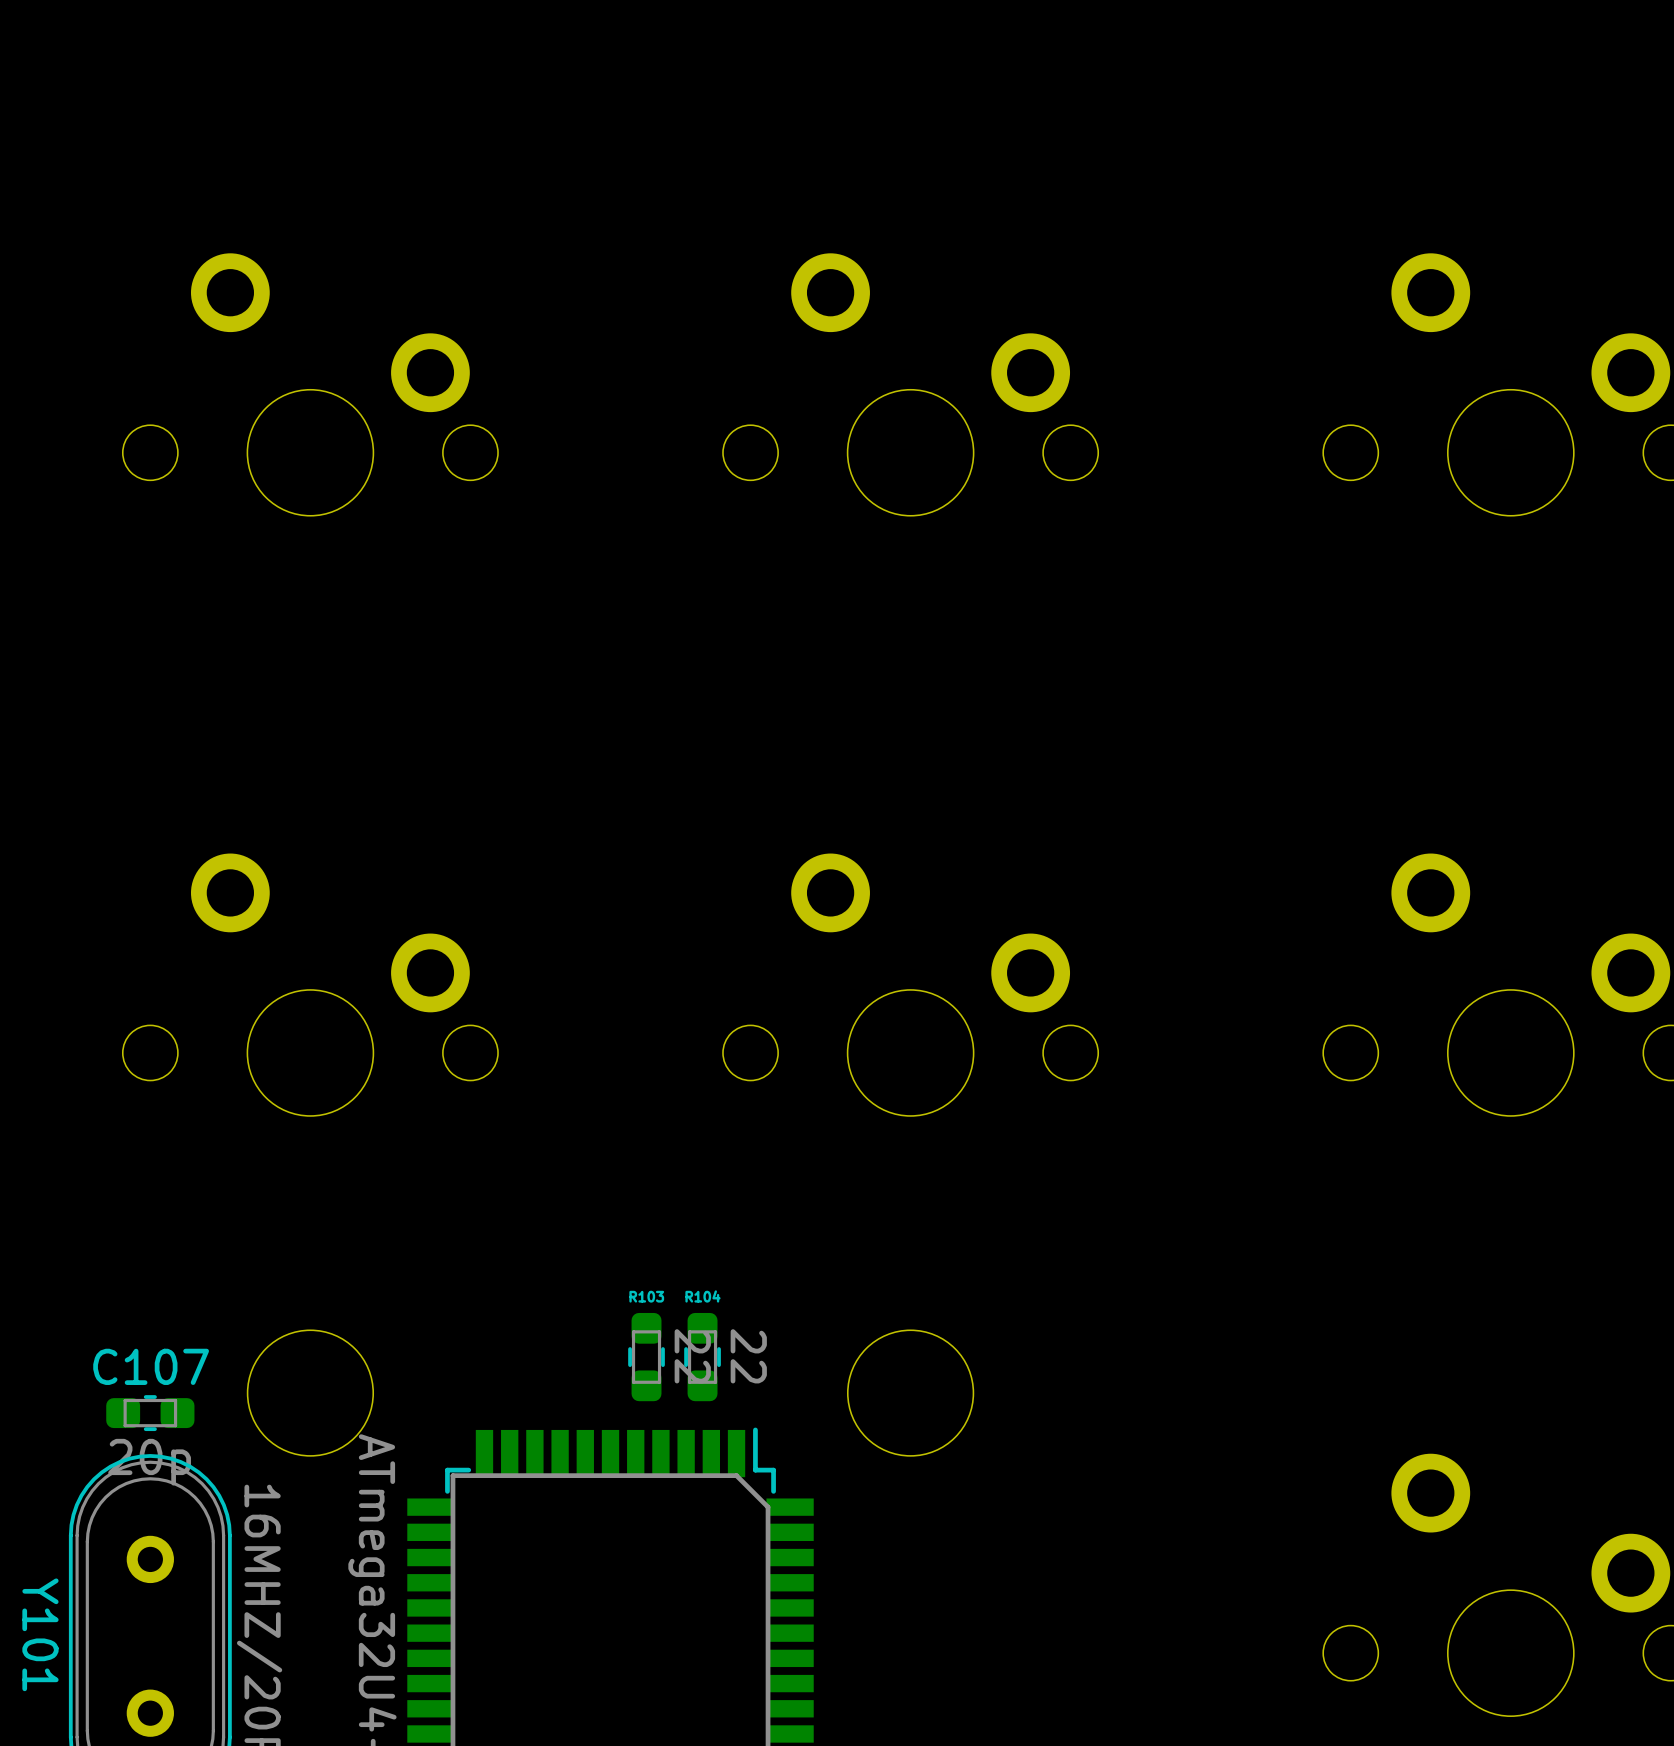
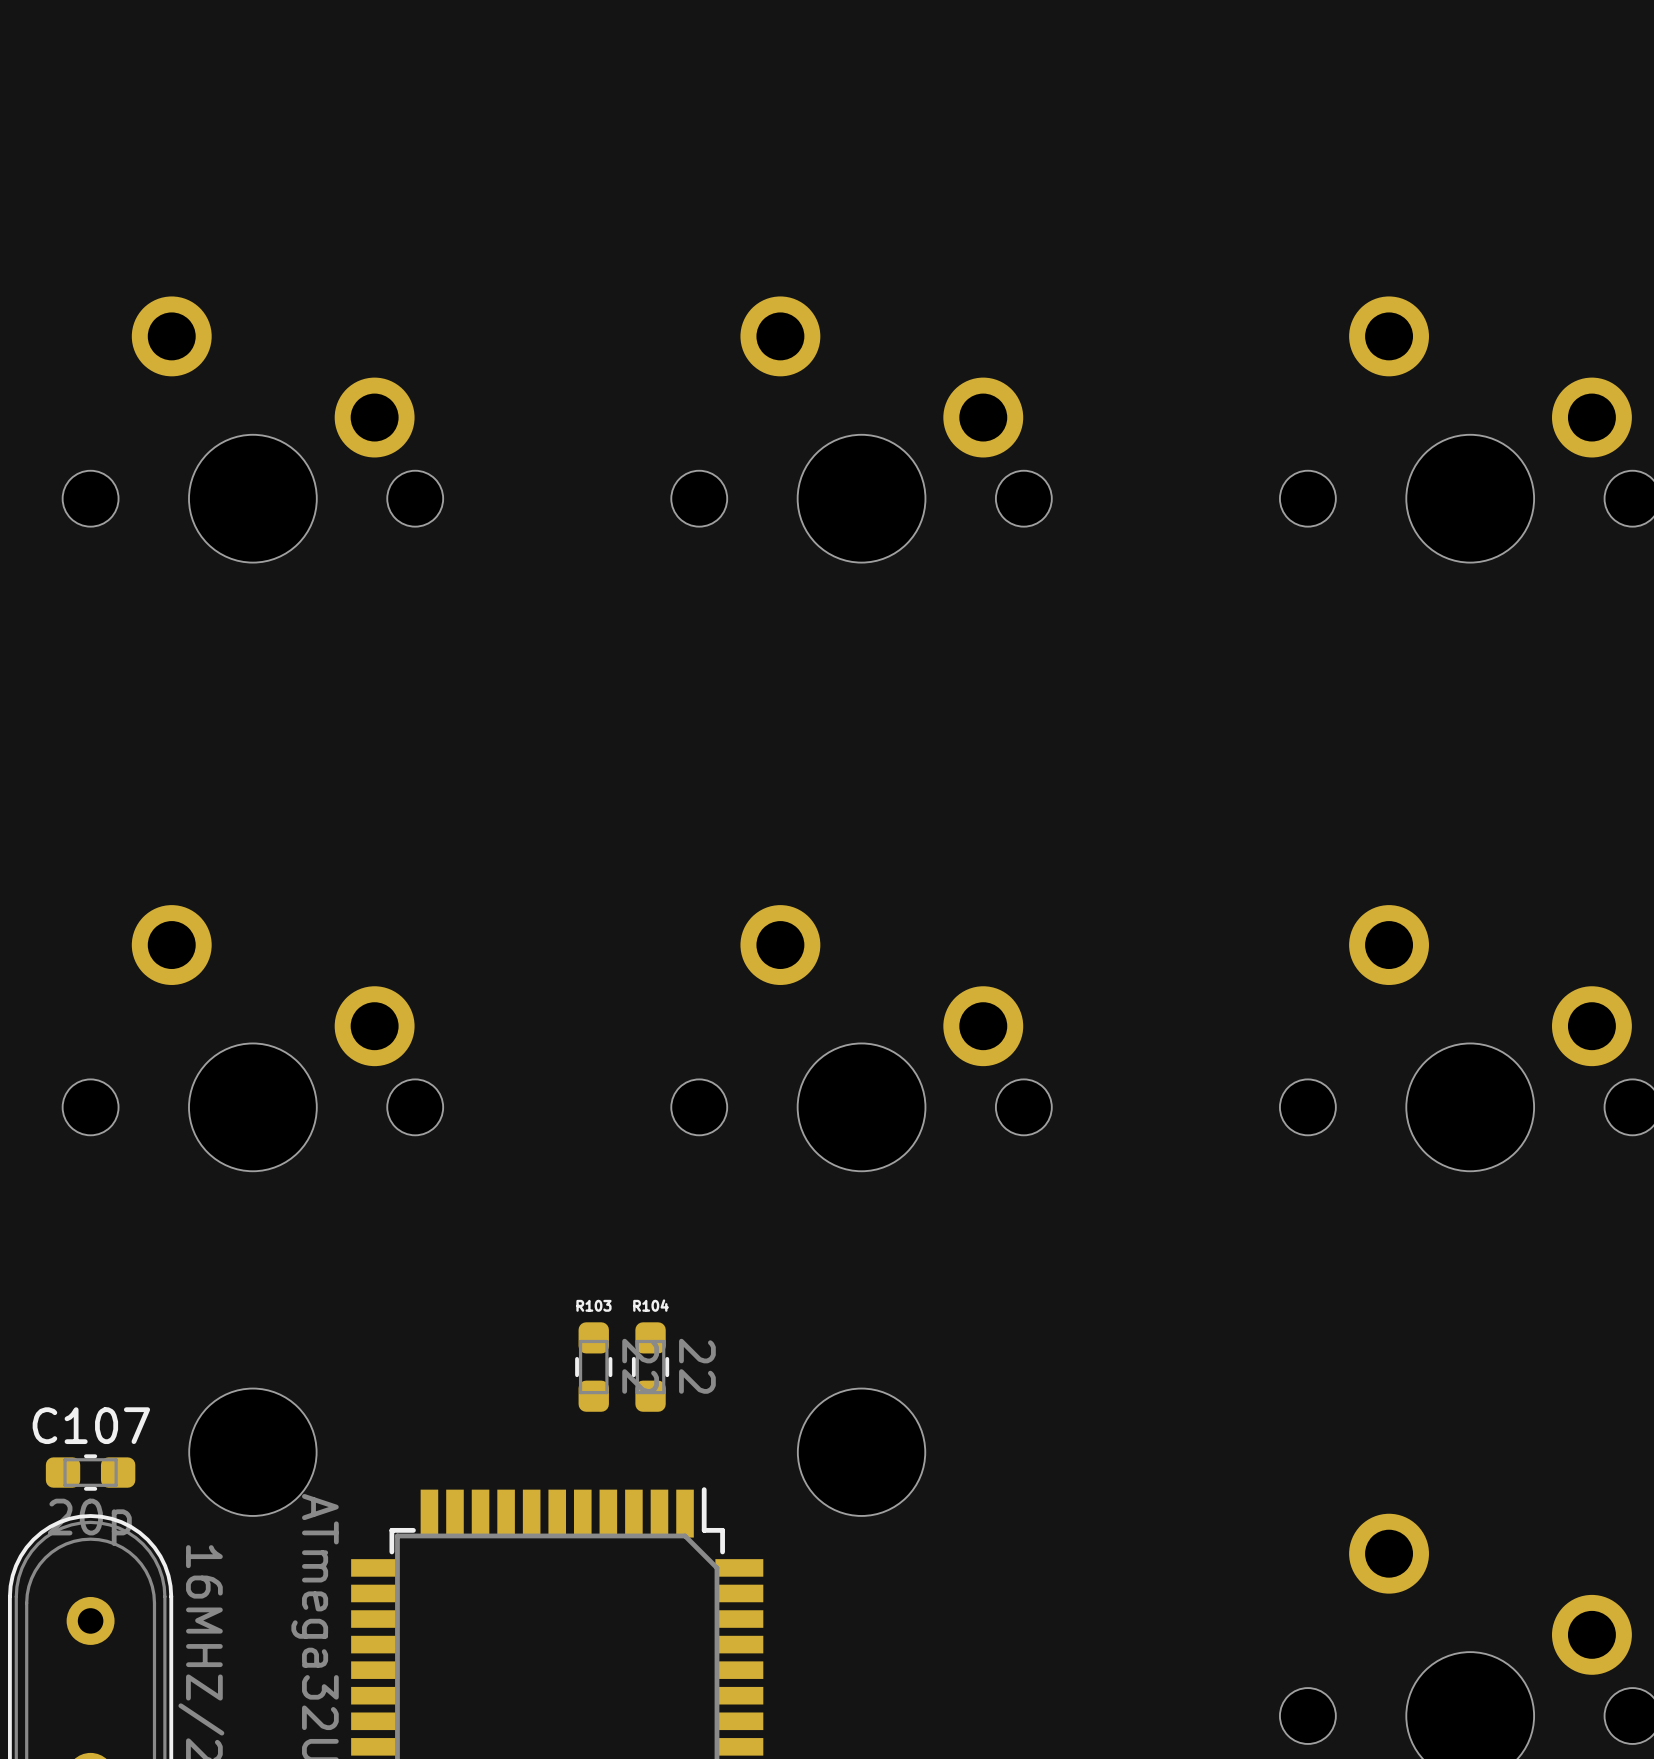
R103 position: (646, 1357) -> (593, 1367)
R104 position: (702, 1357) -> (650, 1367)

